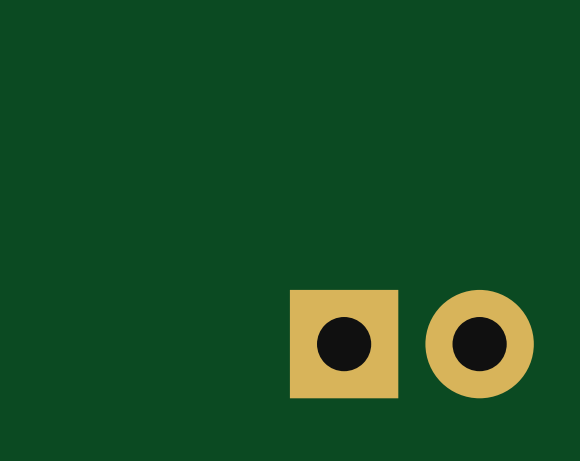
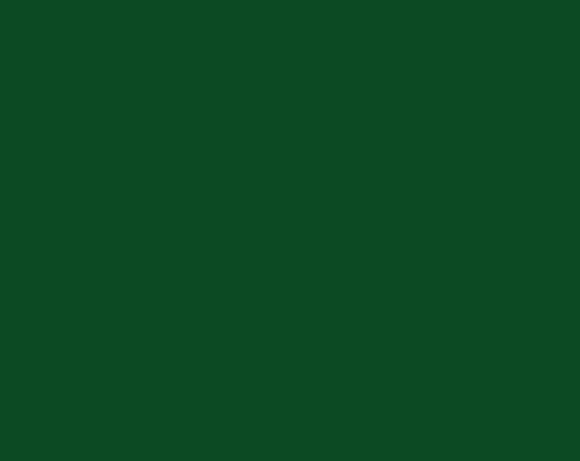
part: (411, 344) -> none

